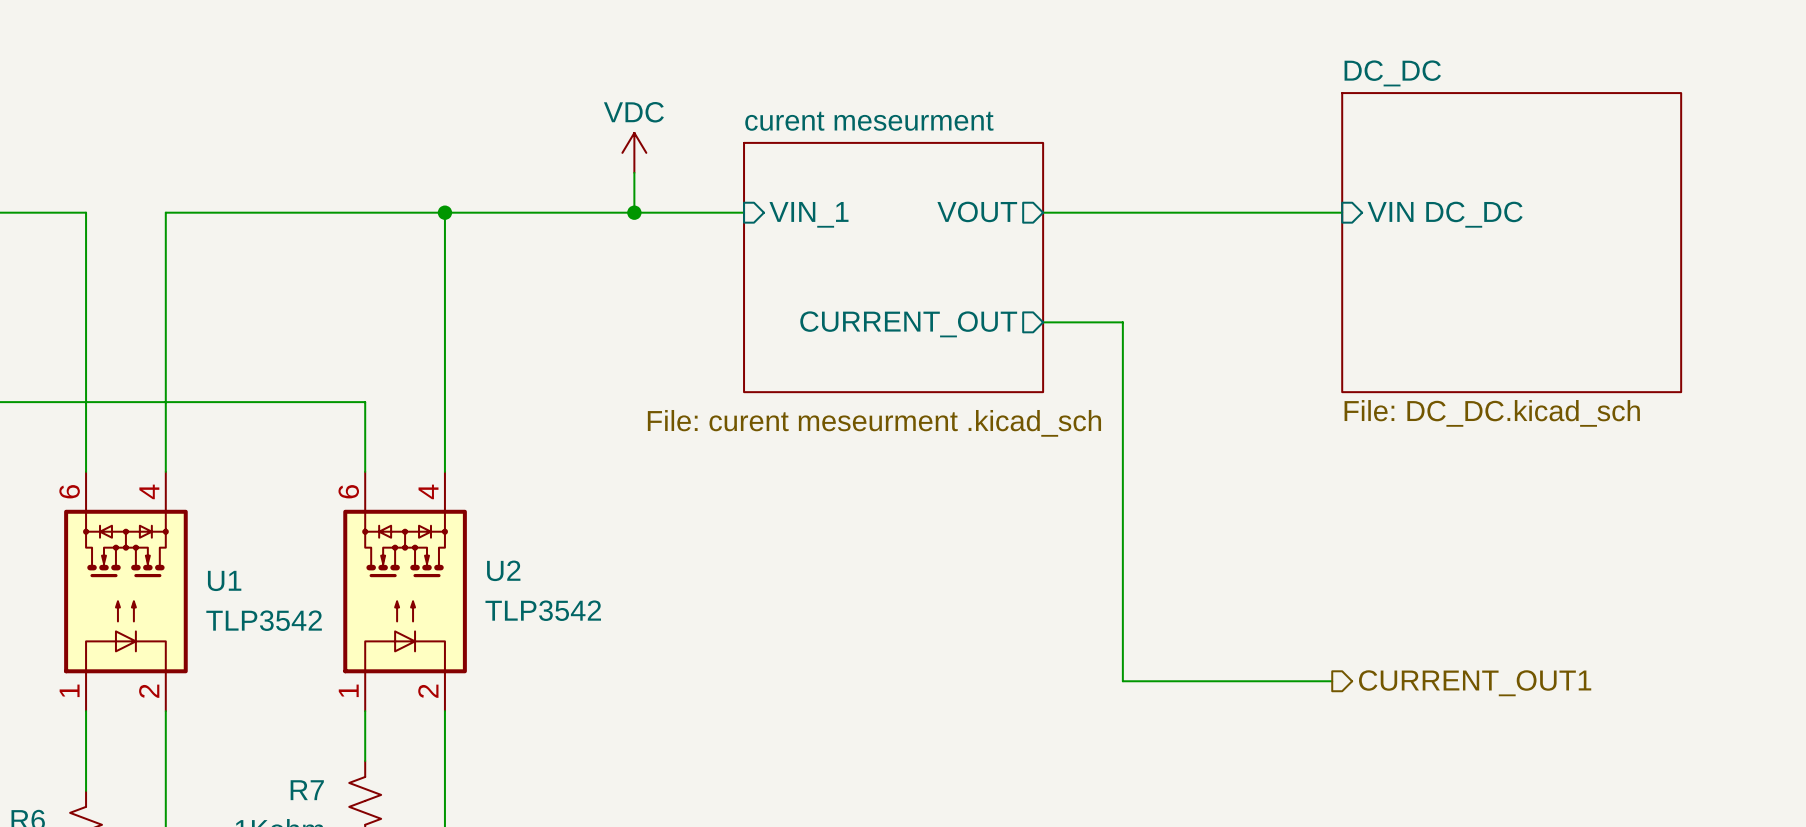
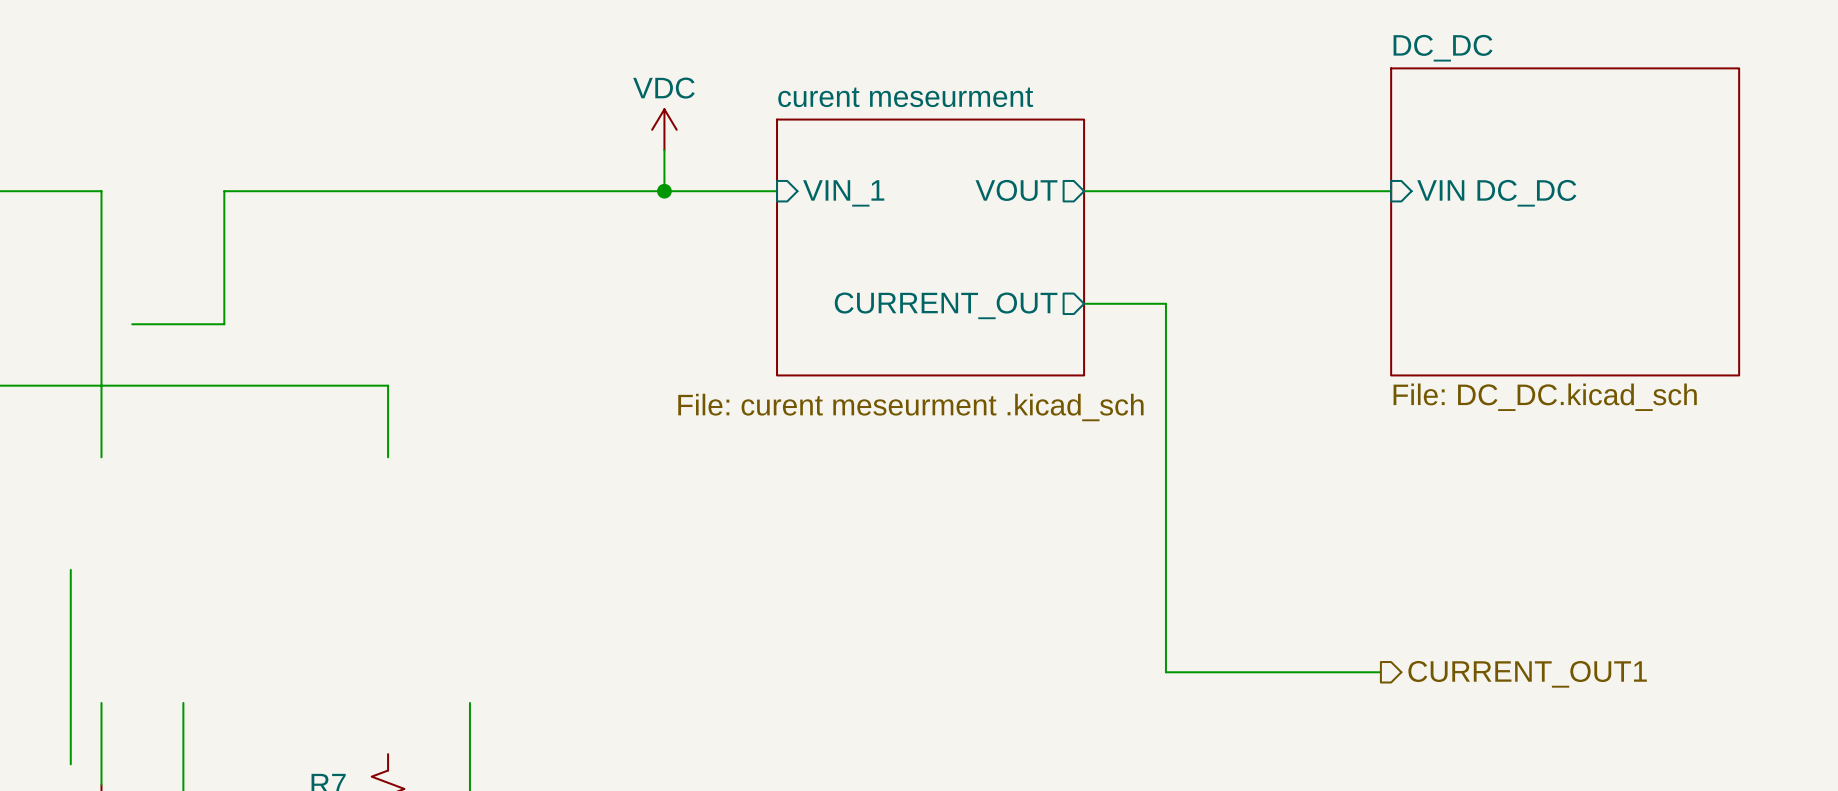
wire: (205, 212) (165, 212) (165, 471) -> (224, 191) (224, 324) (132, 324)
wire: (444, 212) (444, 471) -> none
junction: (444, 212) -> none
wire: none -> (70, 569) (70, 764)
U1: TLP3542 (125, 591) -> none
U2: TLP3542 (405, 591) -> none
wire: (365, 711) (365, 761) -> none

